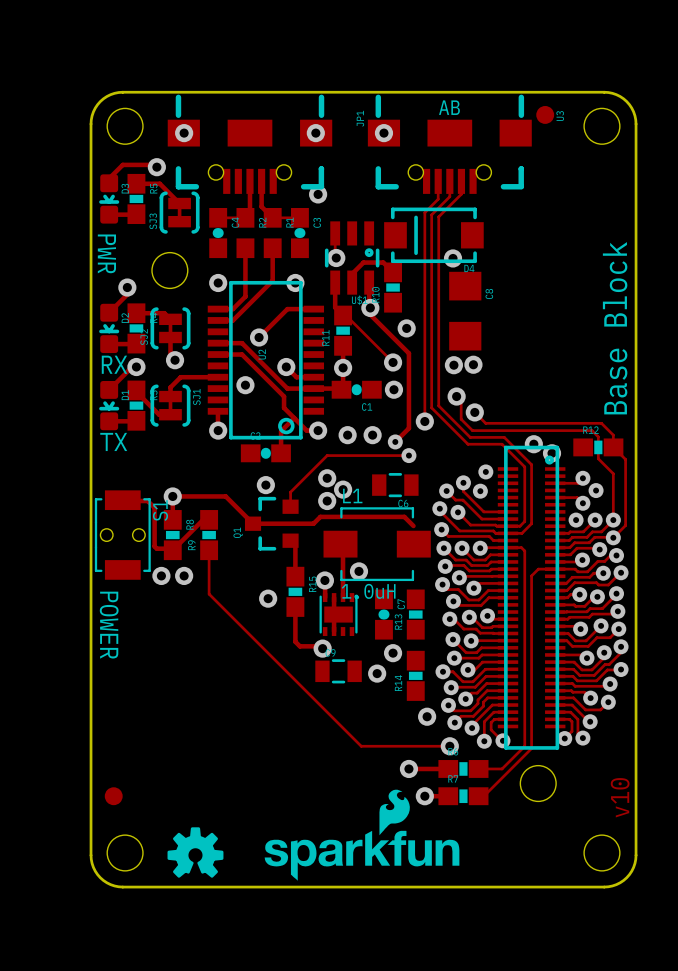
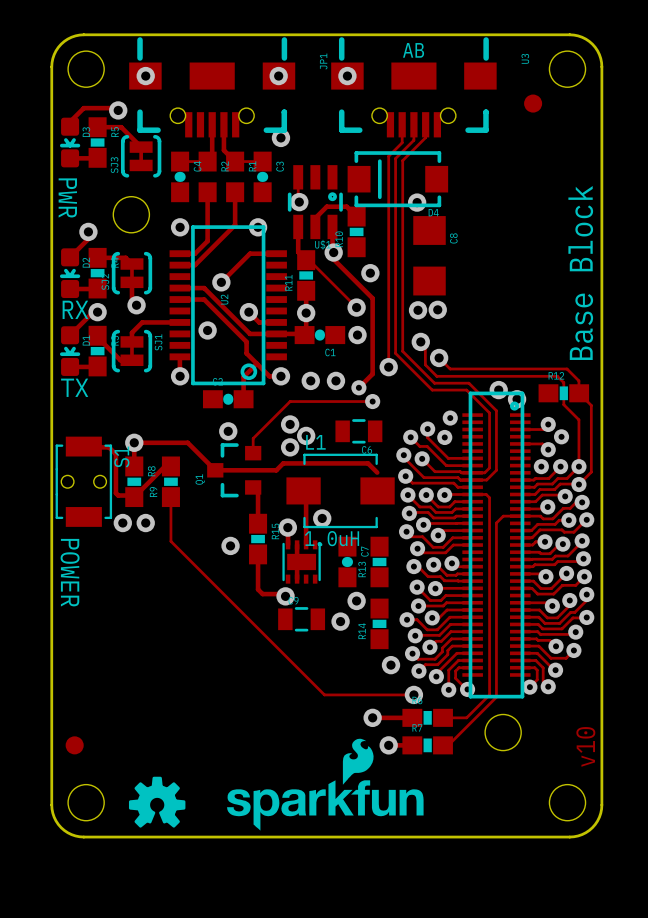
part position: (545, 114) -> (533, 103)

